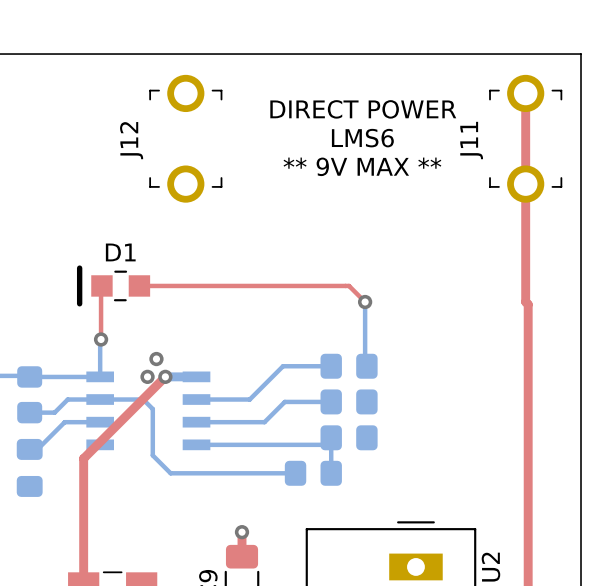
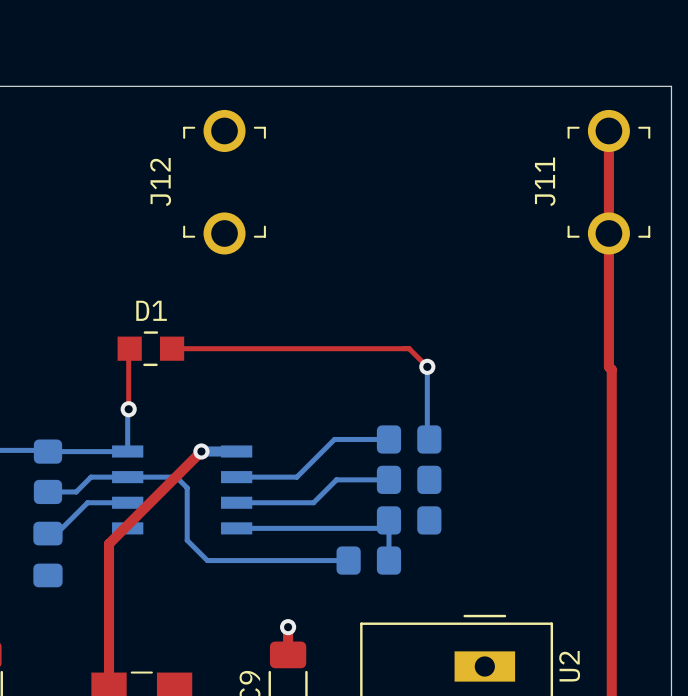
text: DIRECT POWER (363, 109) -> none
text: LMS6 (362, 138) -> none
text: ** 9V MAX ** (362, 166) -> none
line: (79, 268) (79, 303) -> none
via: (156, 359) -> none
via: (147, 376) -> none

